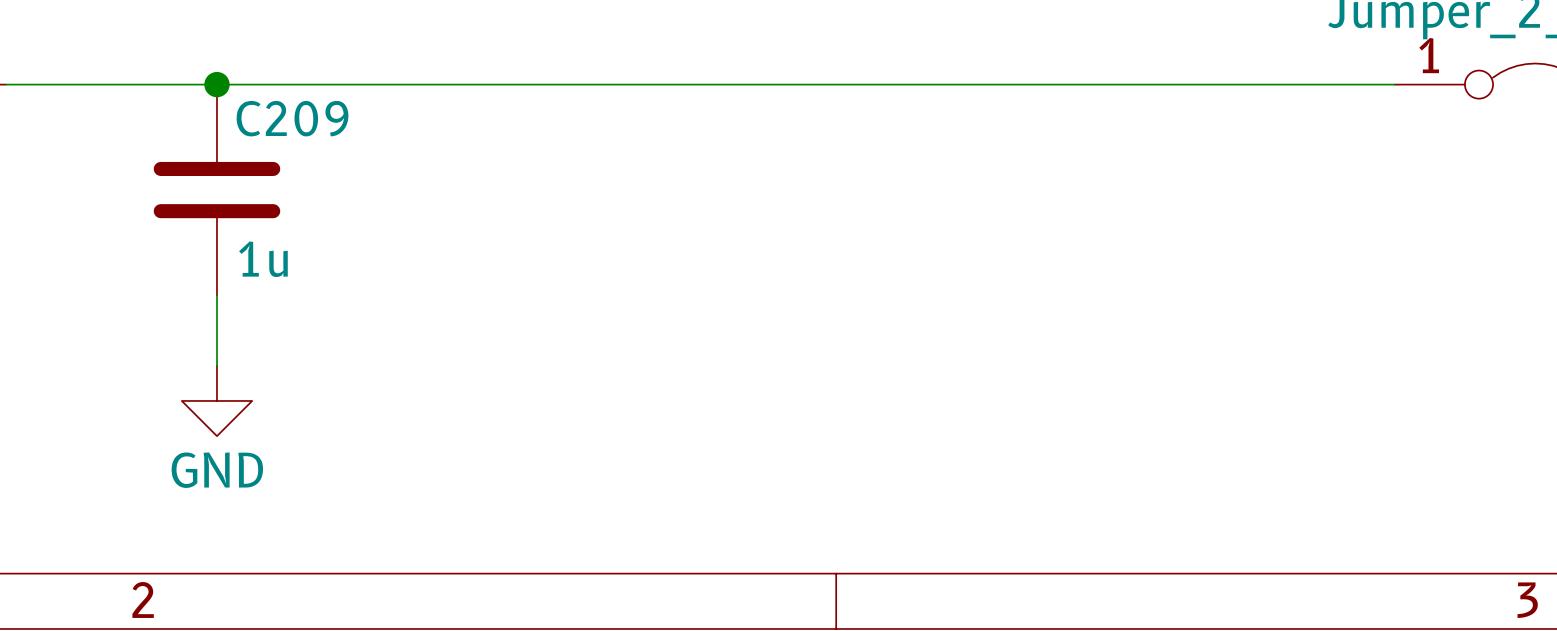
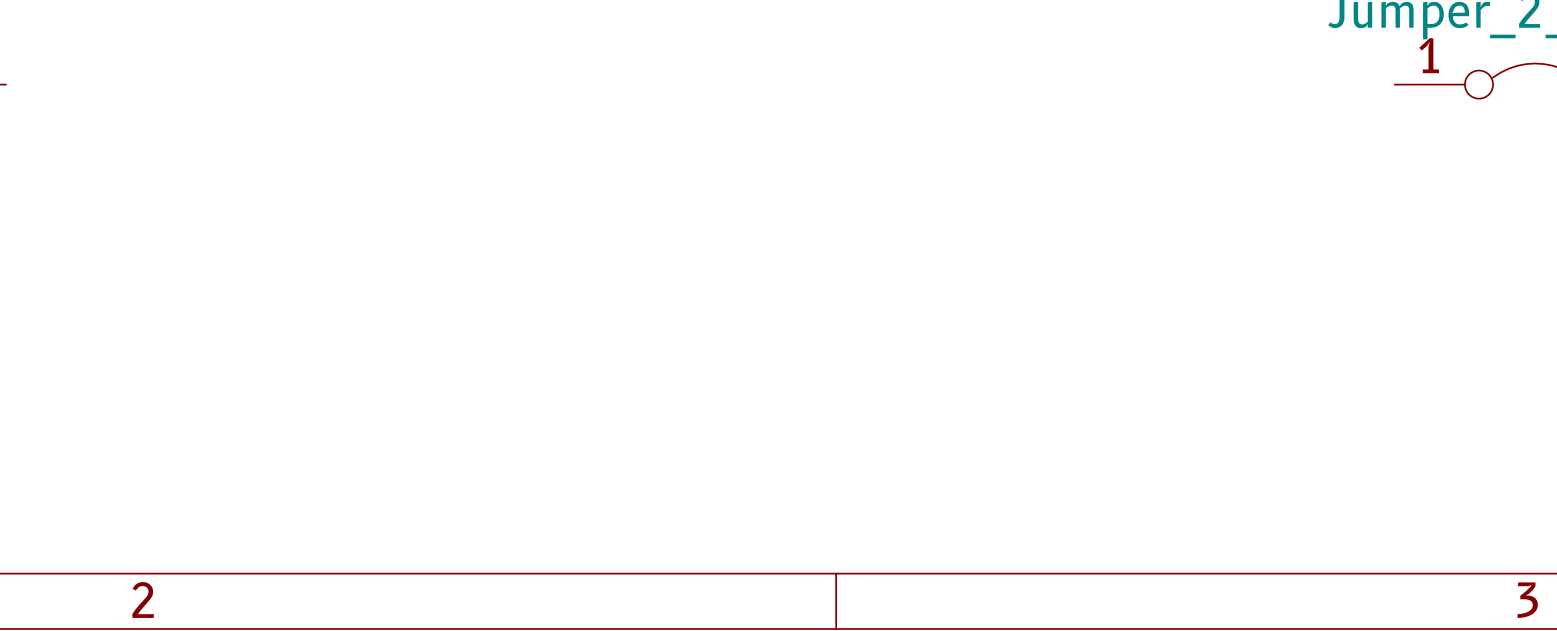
wire: (6, 84) (1394, 84) -> none
junction: (216, 84) -> none
C209: 1u (216, 190) -> none
wire: (216, 295) (216, 365) -> none
power symbol: GND (216, 400) -> none

